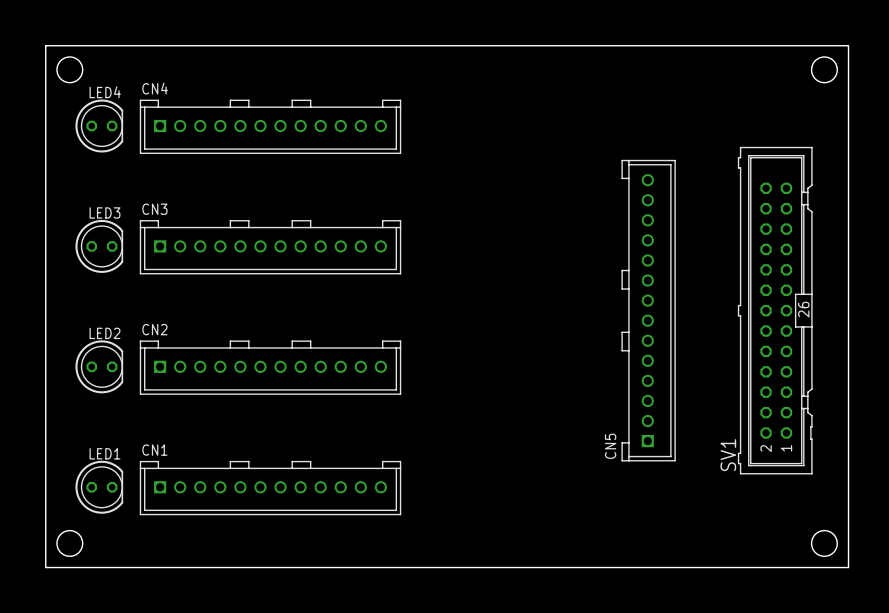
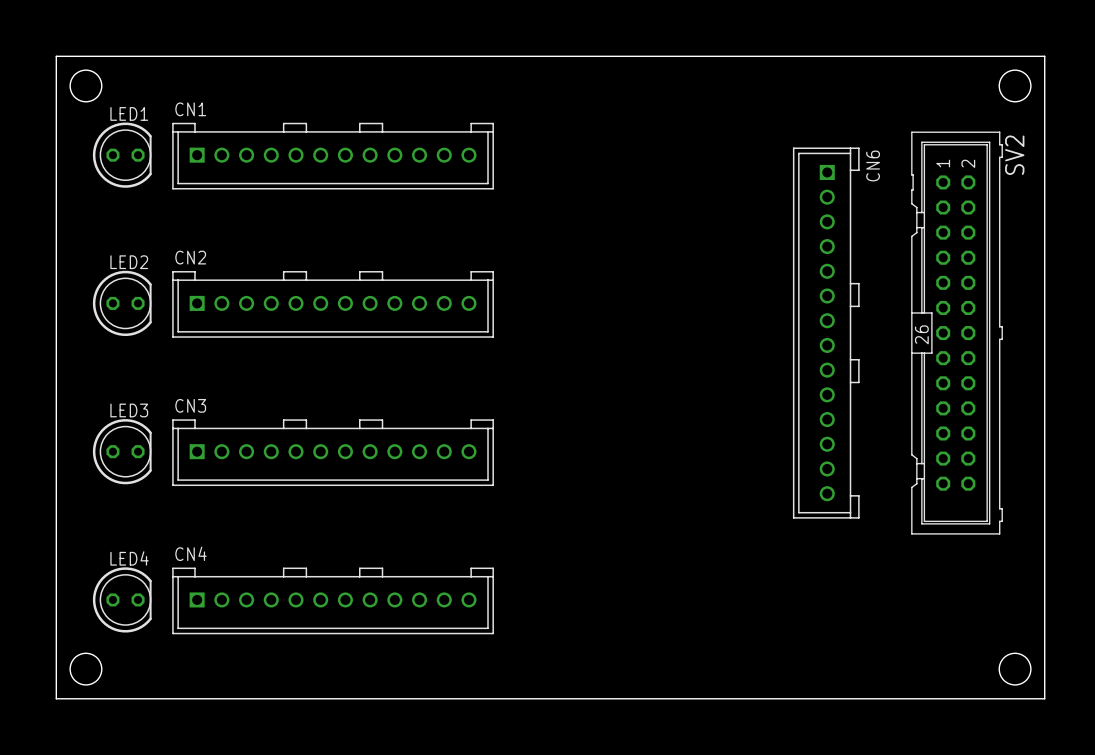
CN4 name: CN4 (155, 88) -> CN1 (190, 109)
LED4 name: LED4 (105, 92) -> LED1 (129, 113)
CN3 name: CN3 (154, 209) -> CN2 (190, 257)
LED3 name: LED3 (104, 212) -> LED2 (129, 262)
CN6: none -> (826, 333)
SV2: none -> (957, 333)
CN5: (648, 310) -> none
SV1: (775, 310) -> none
CN2 name: CN2 (154, 329) -> CN3 (190, 405)
LED2 name: LED2 (104, 333) -> LED3 (129, 410)
CN1 name: CN1 (154, 450) -> CN4 (190, 553)
LED1 name: LED1 (104, 453) -> LED4 (129, 558)

